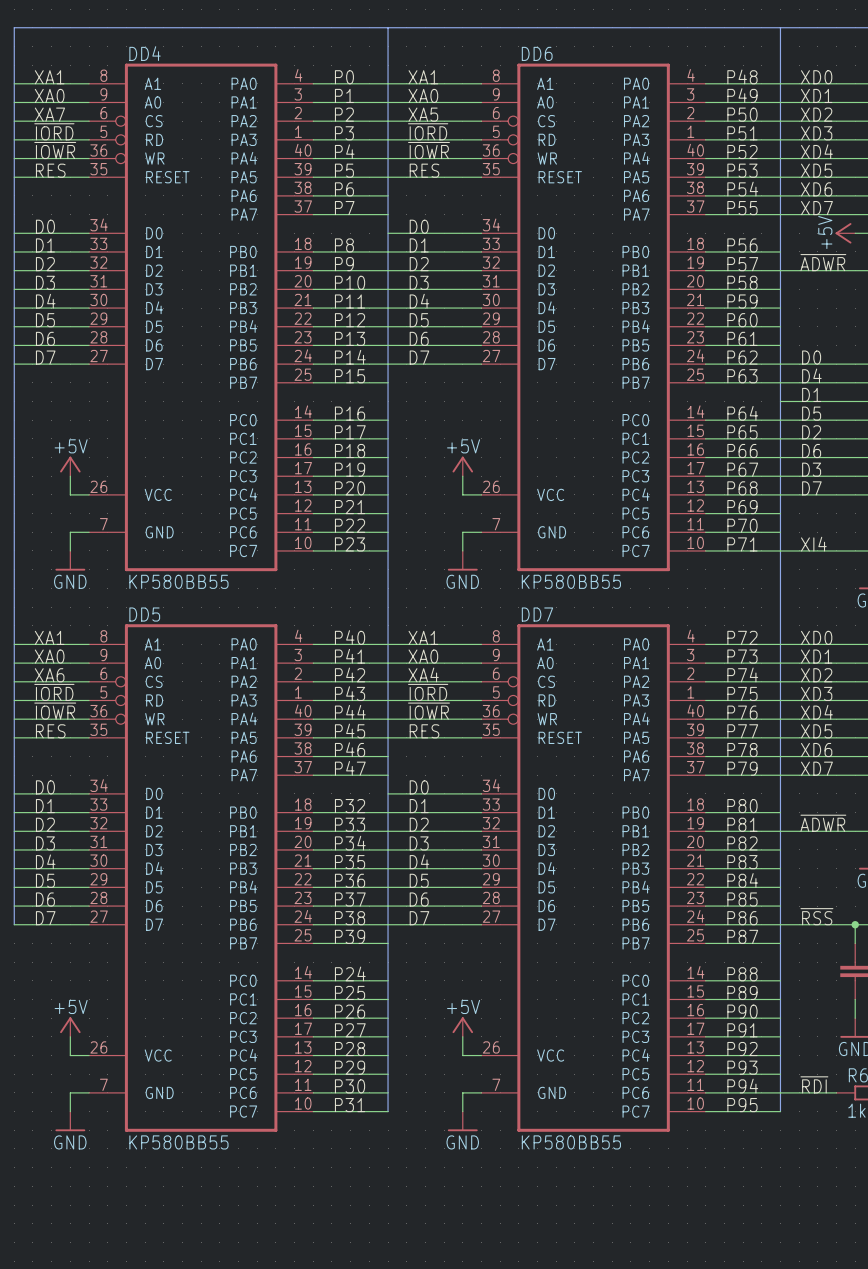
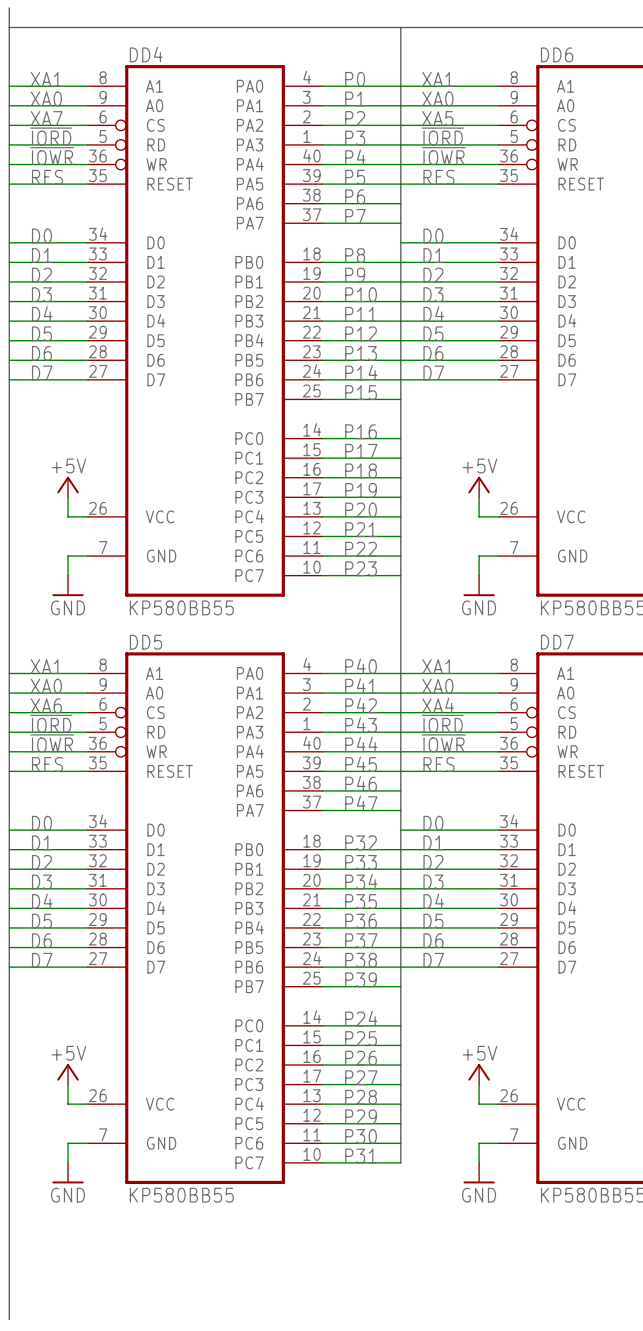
bus: none -> (9, 7) (9, 27)
bus: none -> (9, 967) (9, 1319)

